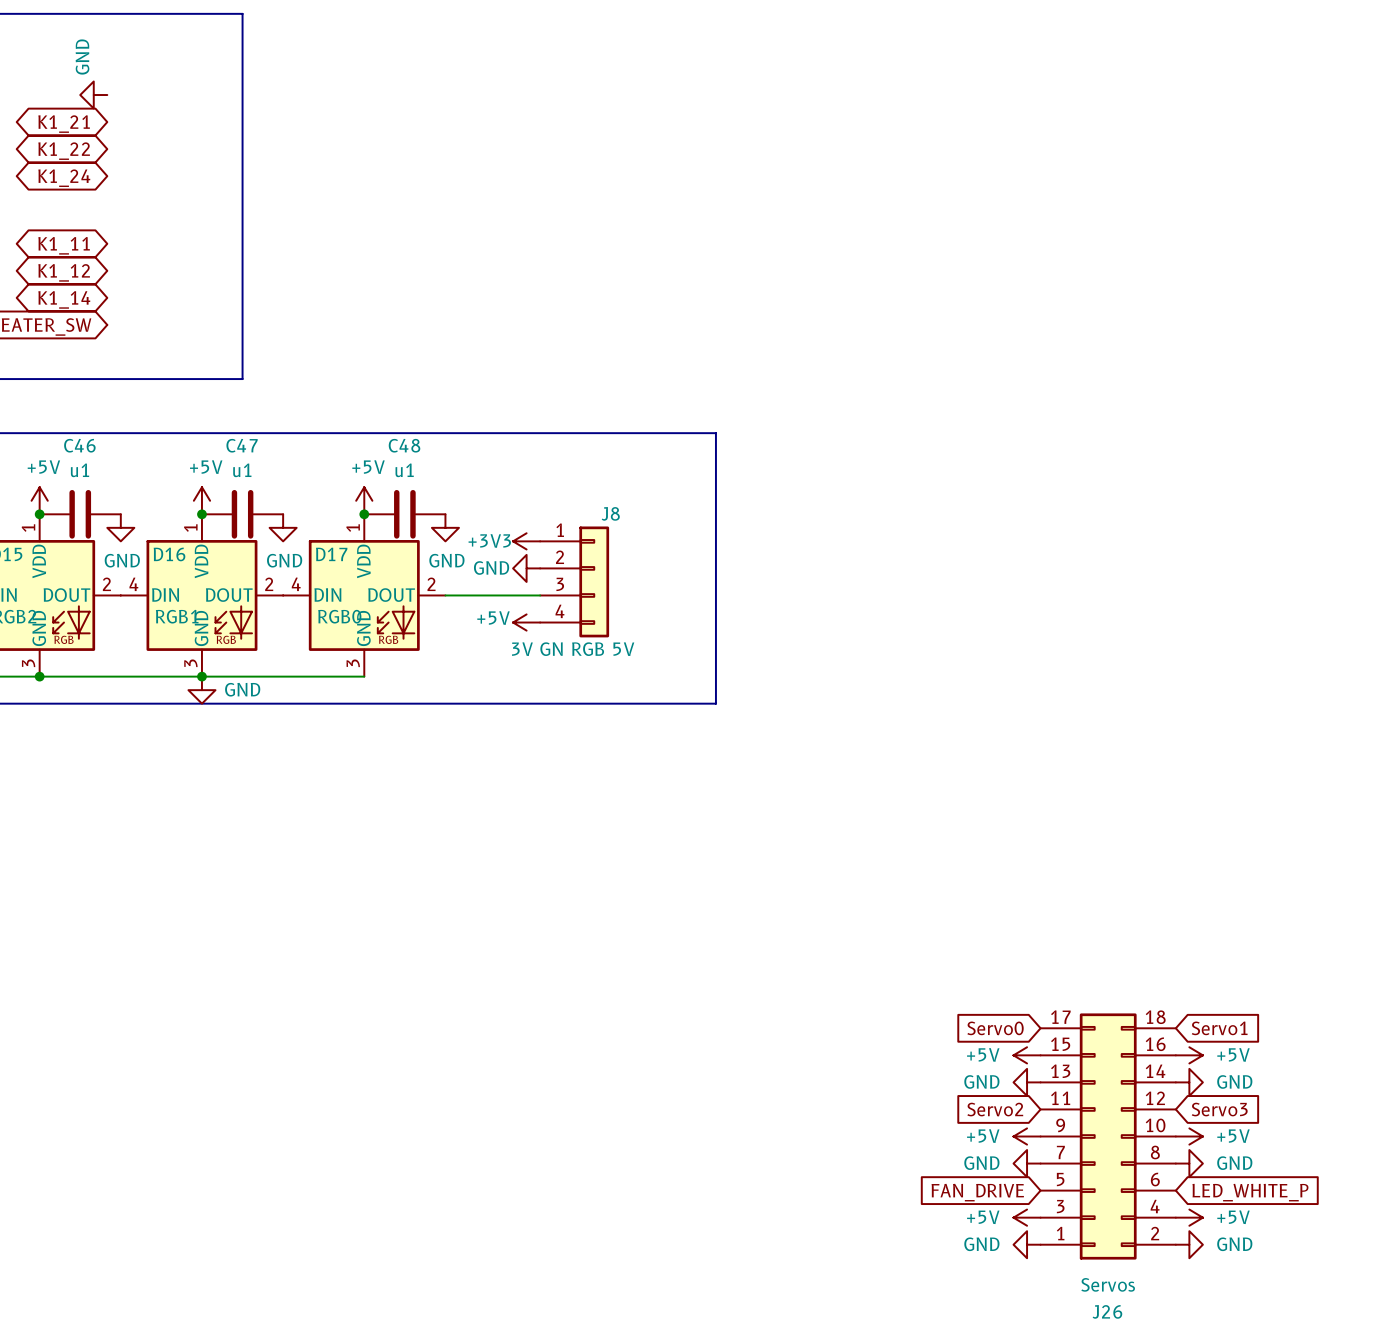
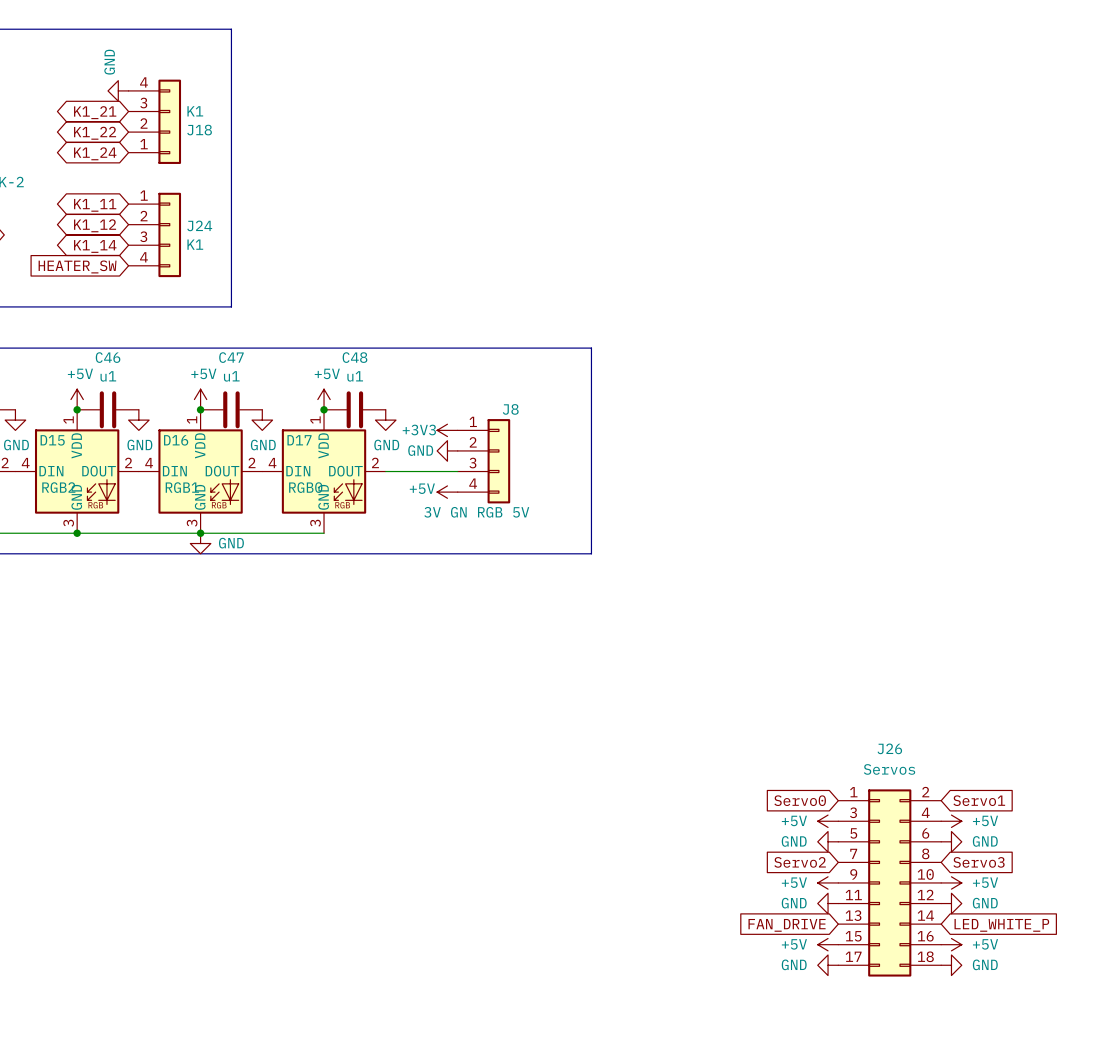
J18: none -> K1 (154, 121)
J24: none -> K1 (154, 234)
J26 flip: as is (1108, 1136) -> up-down (889, 882)

